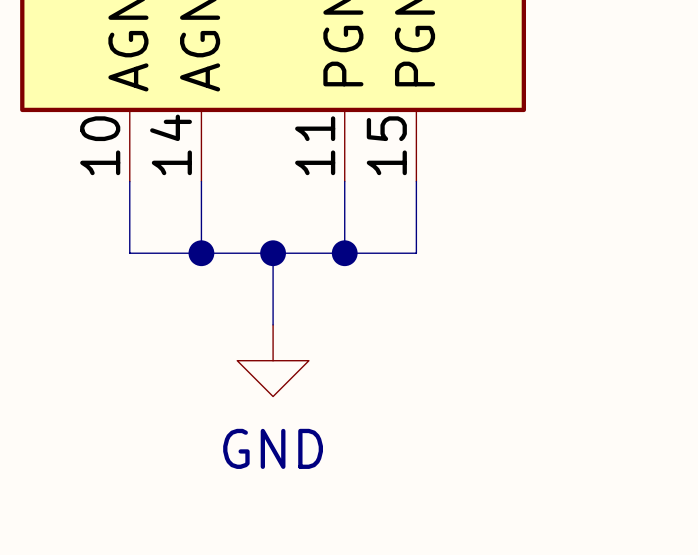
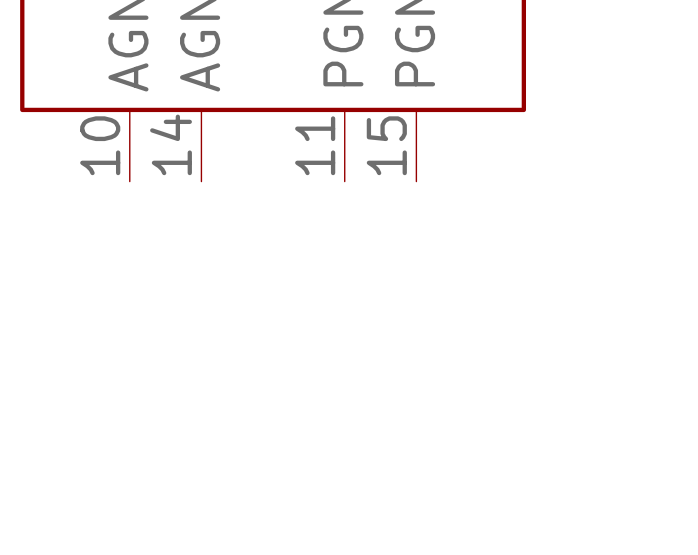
wire: (129, 181) (129, 253) (416, 253) (416, 181) -> none
wire: (201, 181) (201, 253) -> none
wire: (344, 181) (344, 253) -> none
junction: (201, 253) -> none
wire: (273, 253) (273, 324) -> none
junction: (273, 253) -> none
junction: (344, 253) -> none
power symbol: GND (273, 360) -> none

